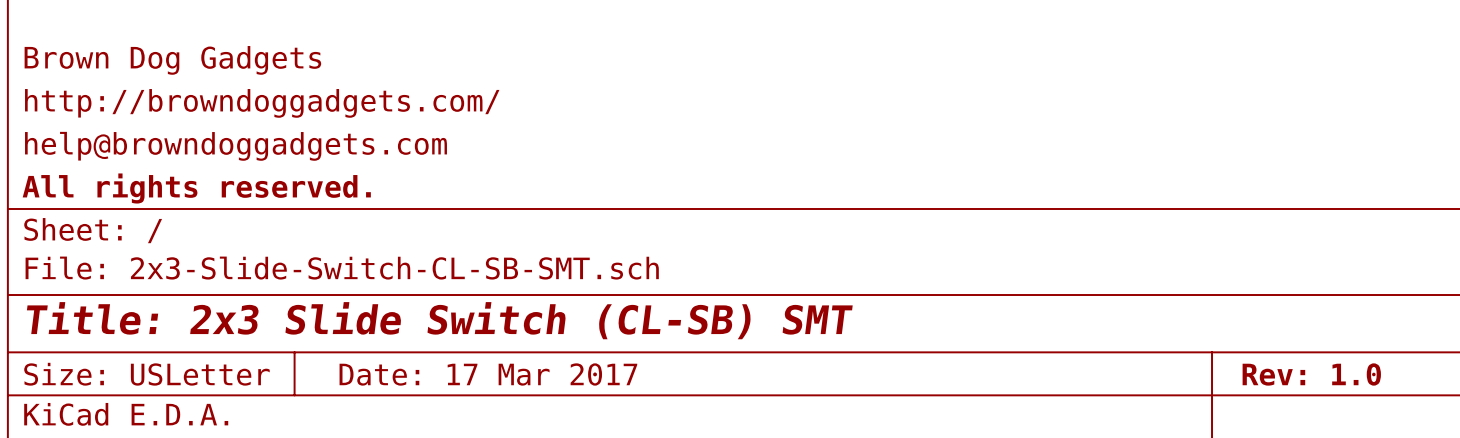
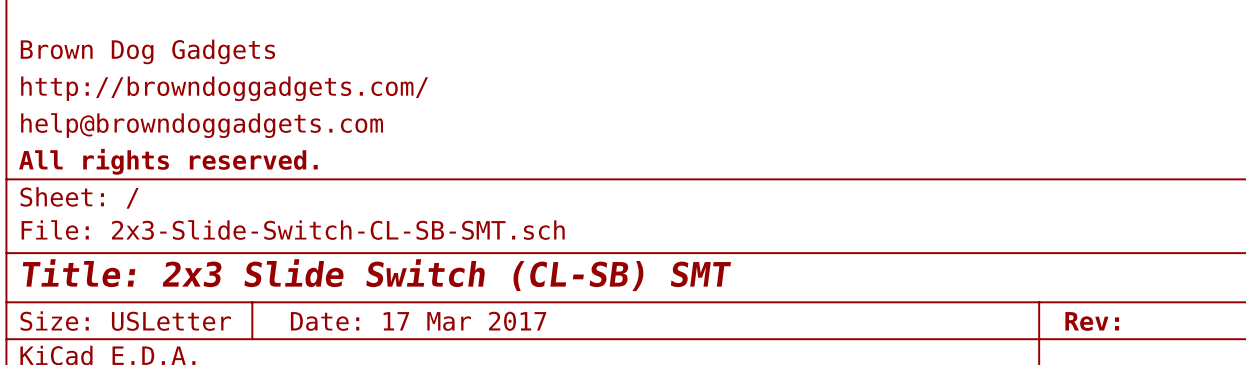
title block: Rev: 1.0 (1311, 374) -> Rev: (1092, 321)

